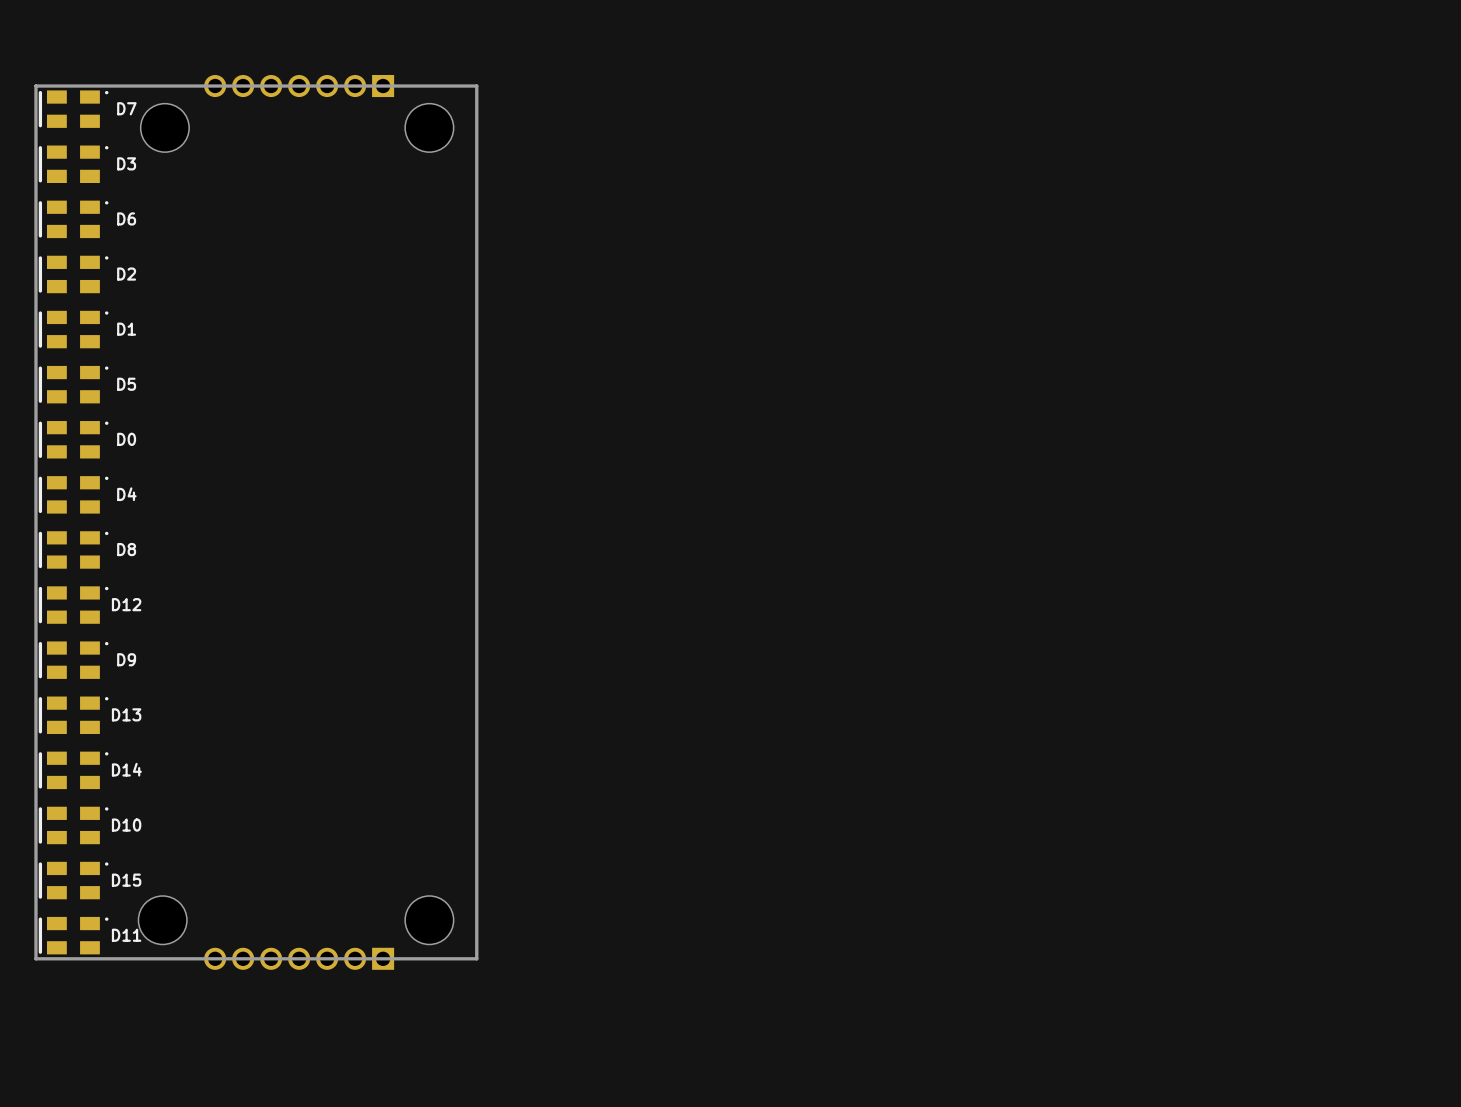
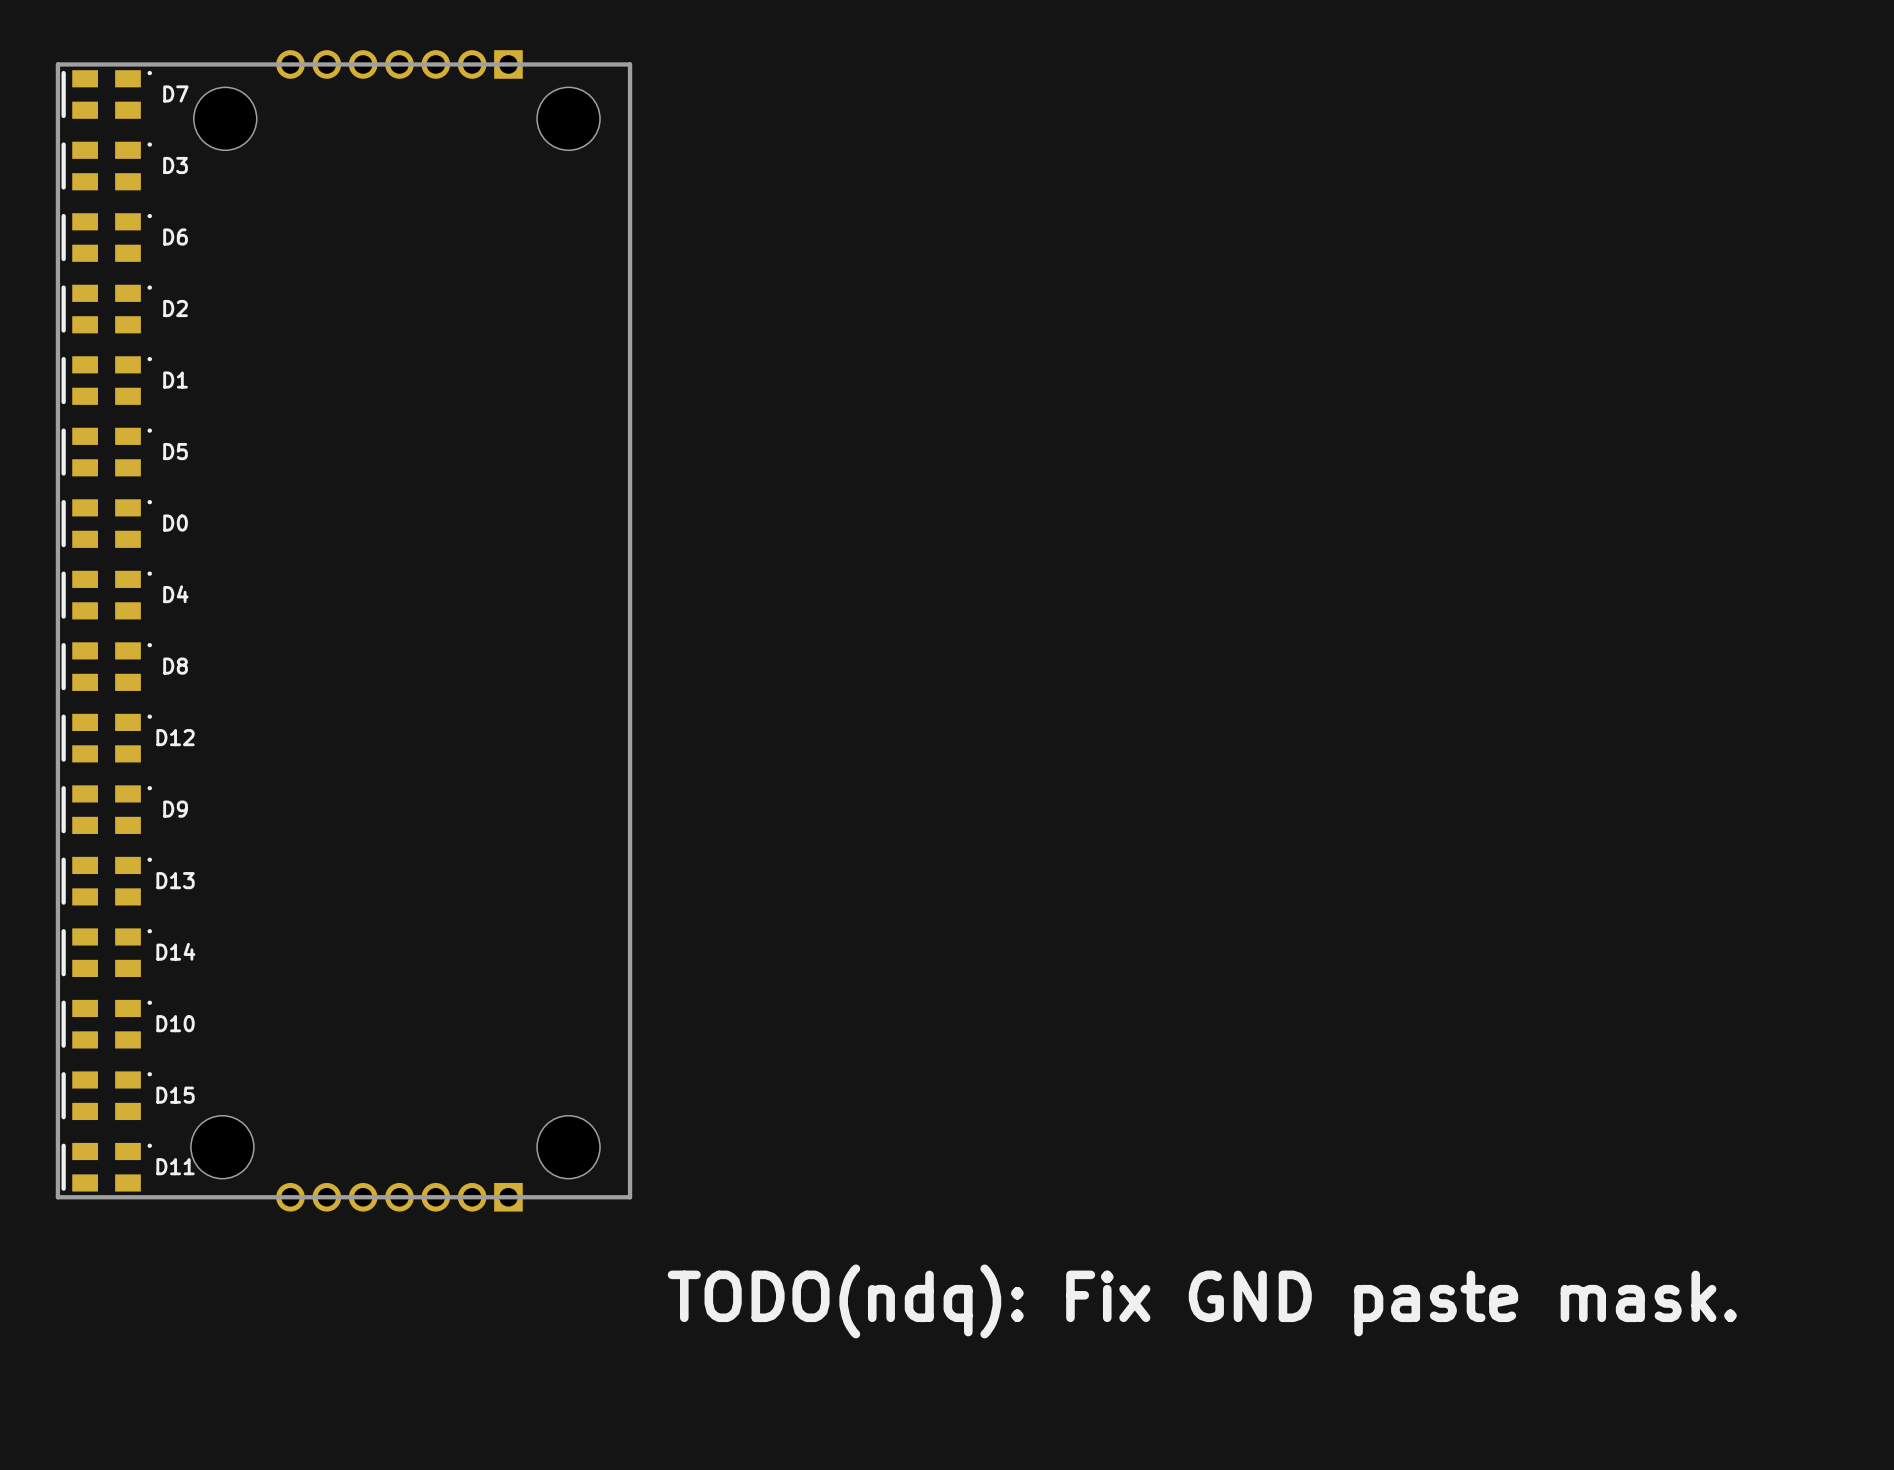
text: none -> TODO(ndq): Fix GND paste mask. (1202, 1301)

